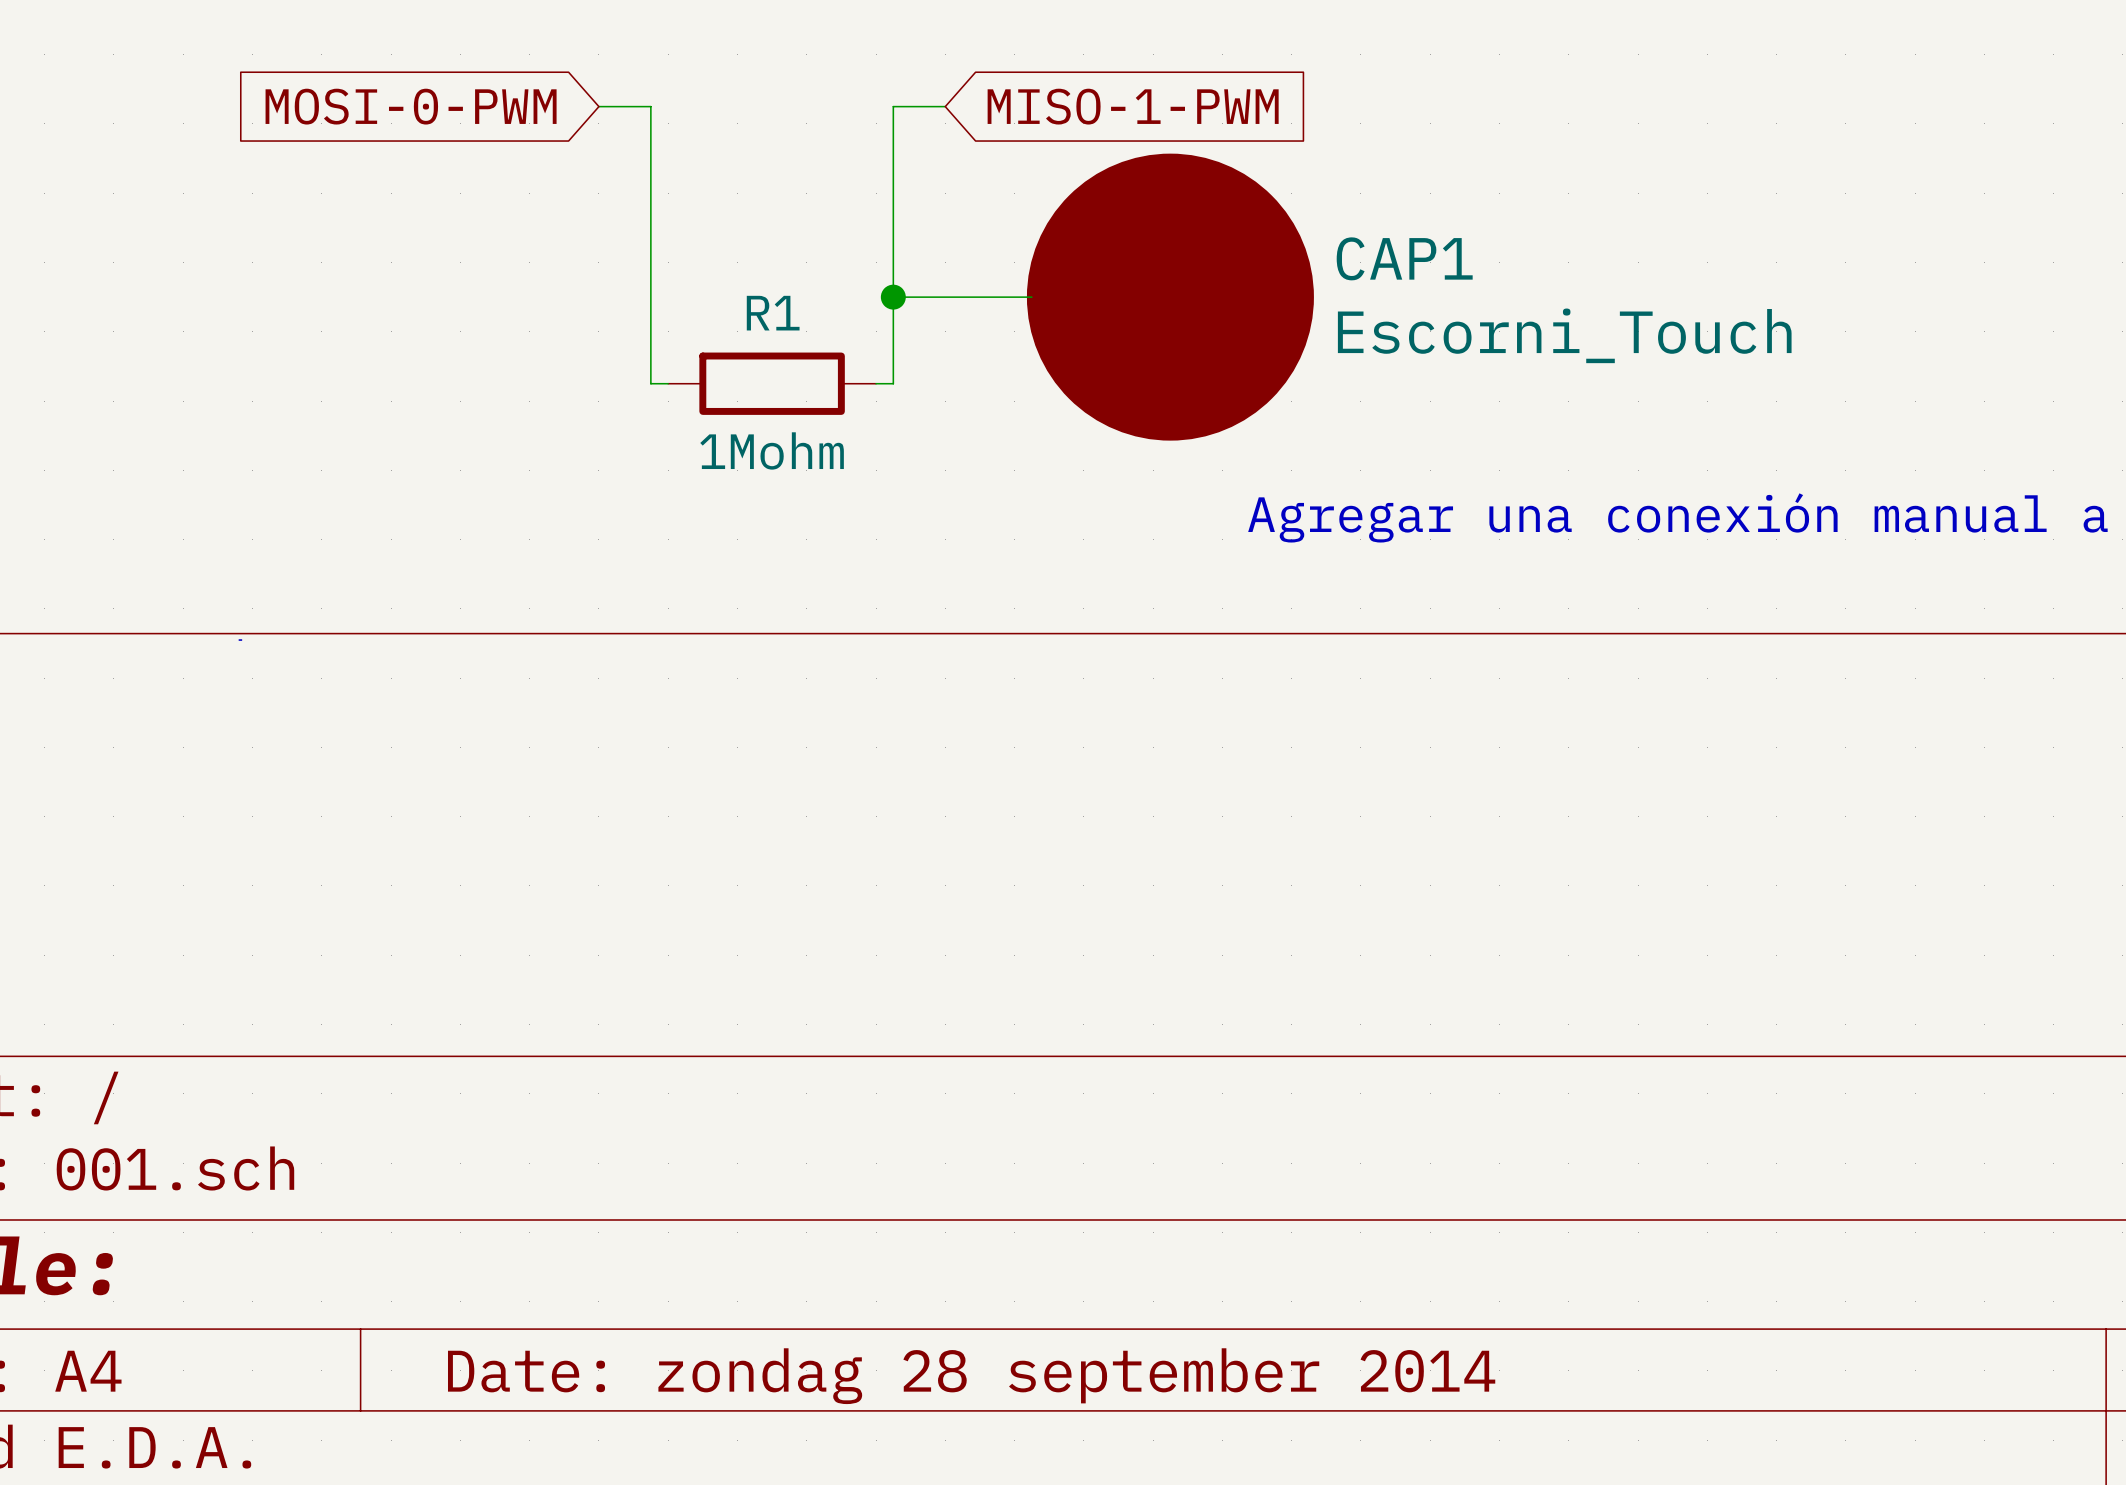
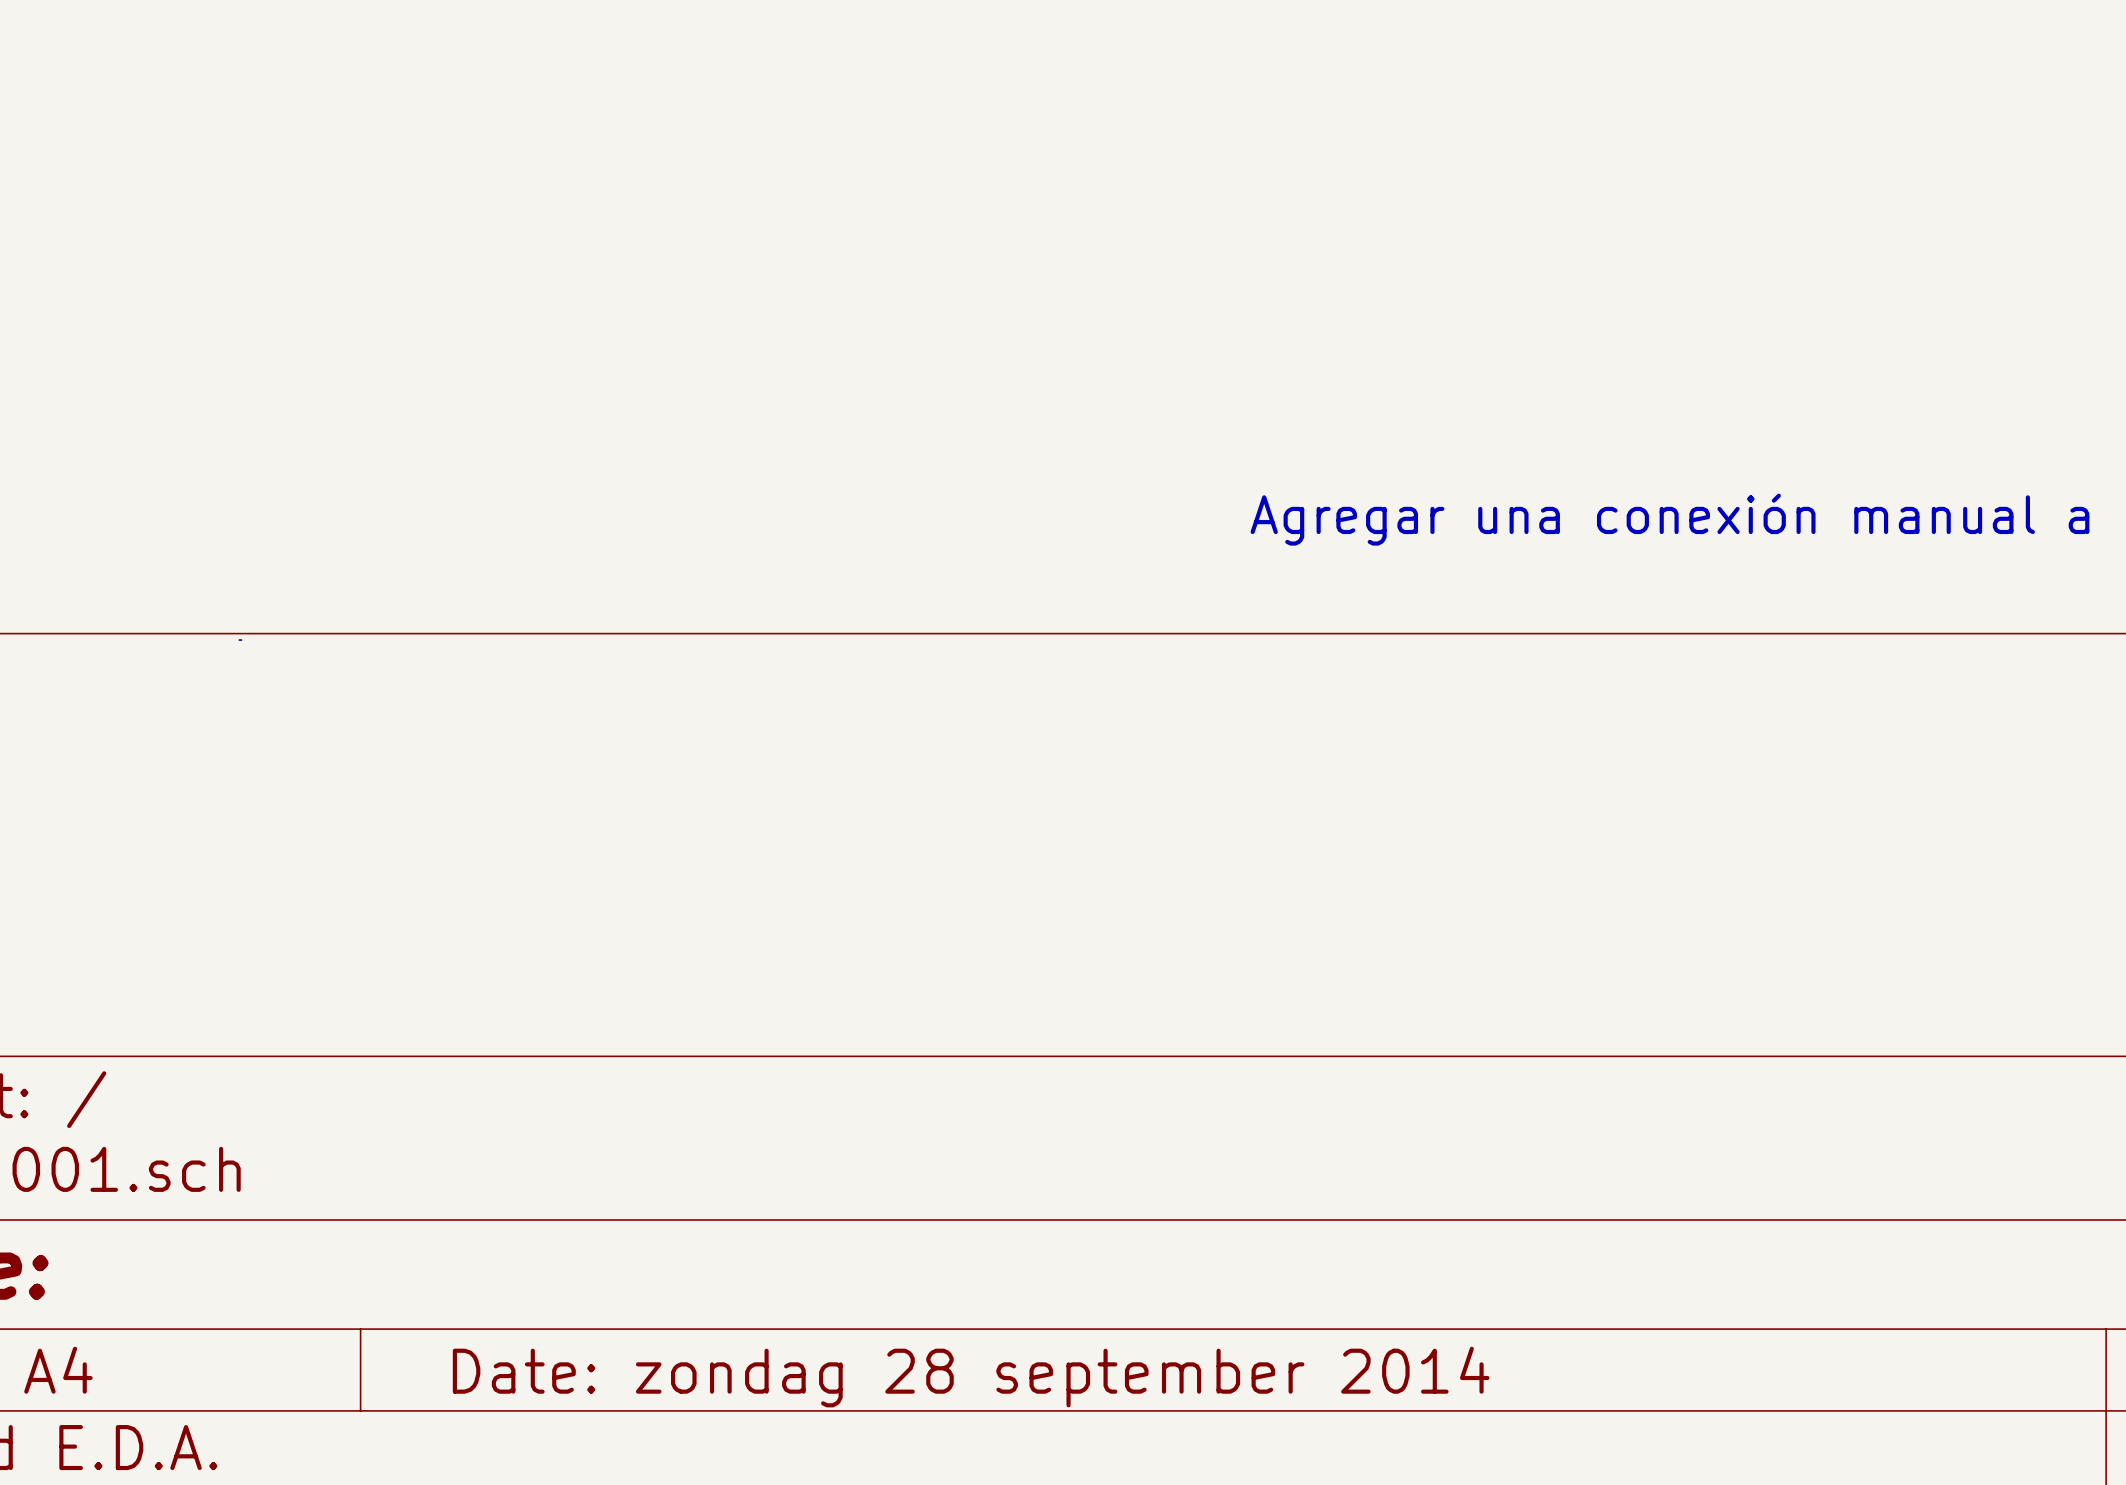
global label: MOSI-0-PWM (411, 106) -> none
wire: (598, 106) (650, 106) (650, 383) (668, 383) -> none
wire: (945, 106) (893, 106) (893, 383) (876, 383) -> none
global label: MISO-1-PWM (1133, 106) -> none
wire: (893, 297) (1031, 297) -> none
junction: (893, 297) -> none
CAP1: Escorni_Touch (1170, 297) -> none
R1: 1Mohm (772, 383) -> none

